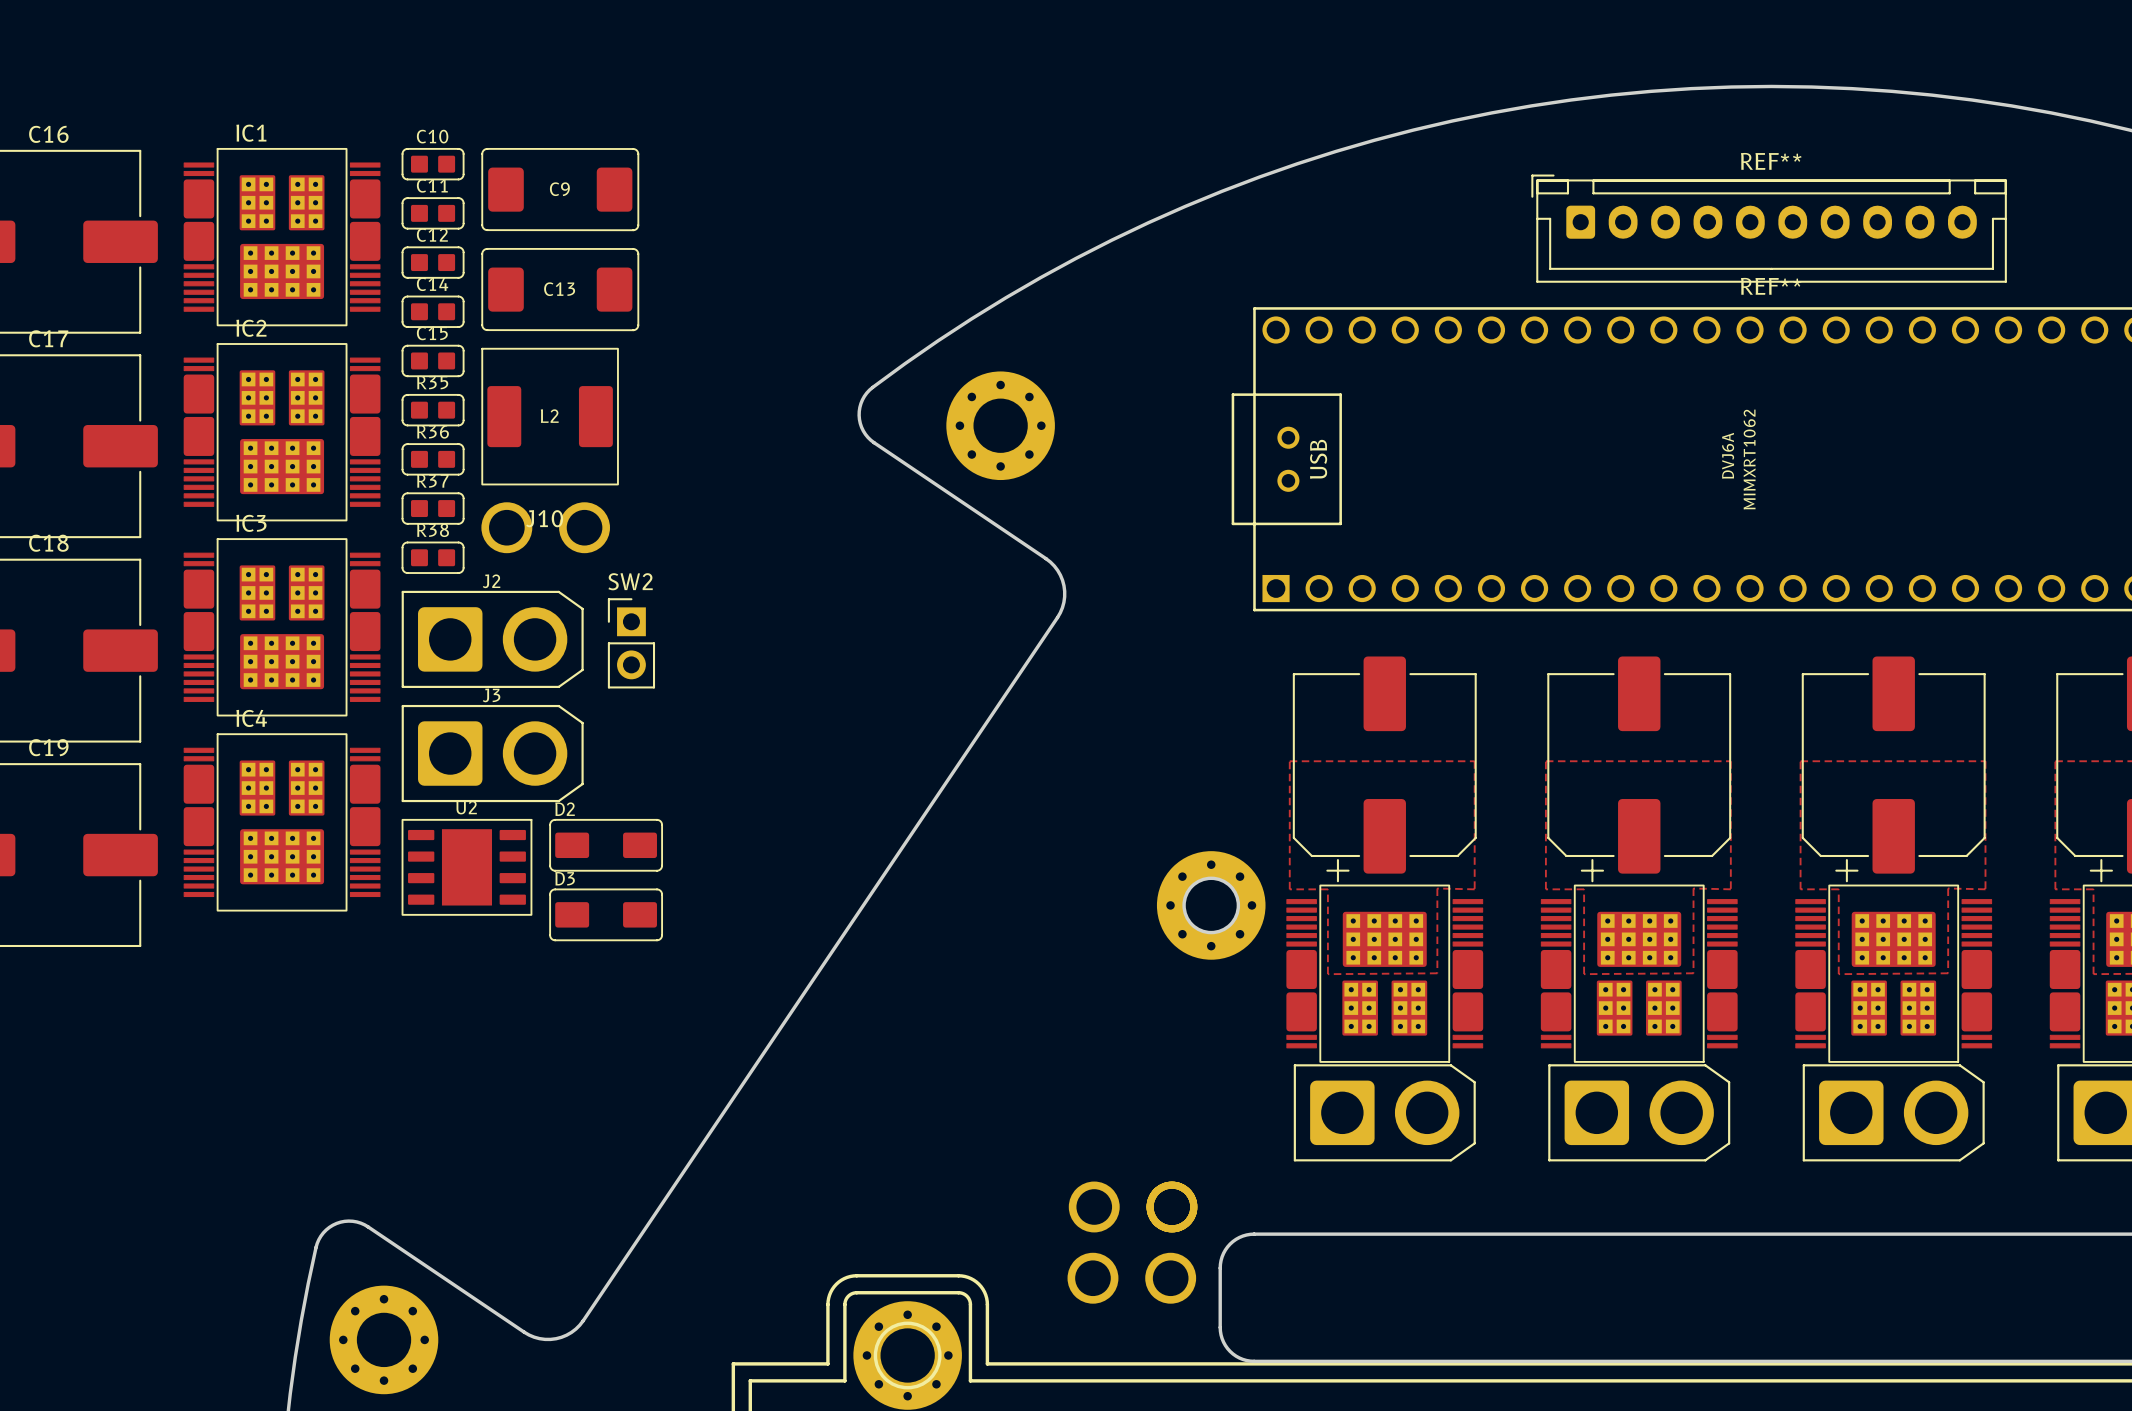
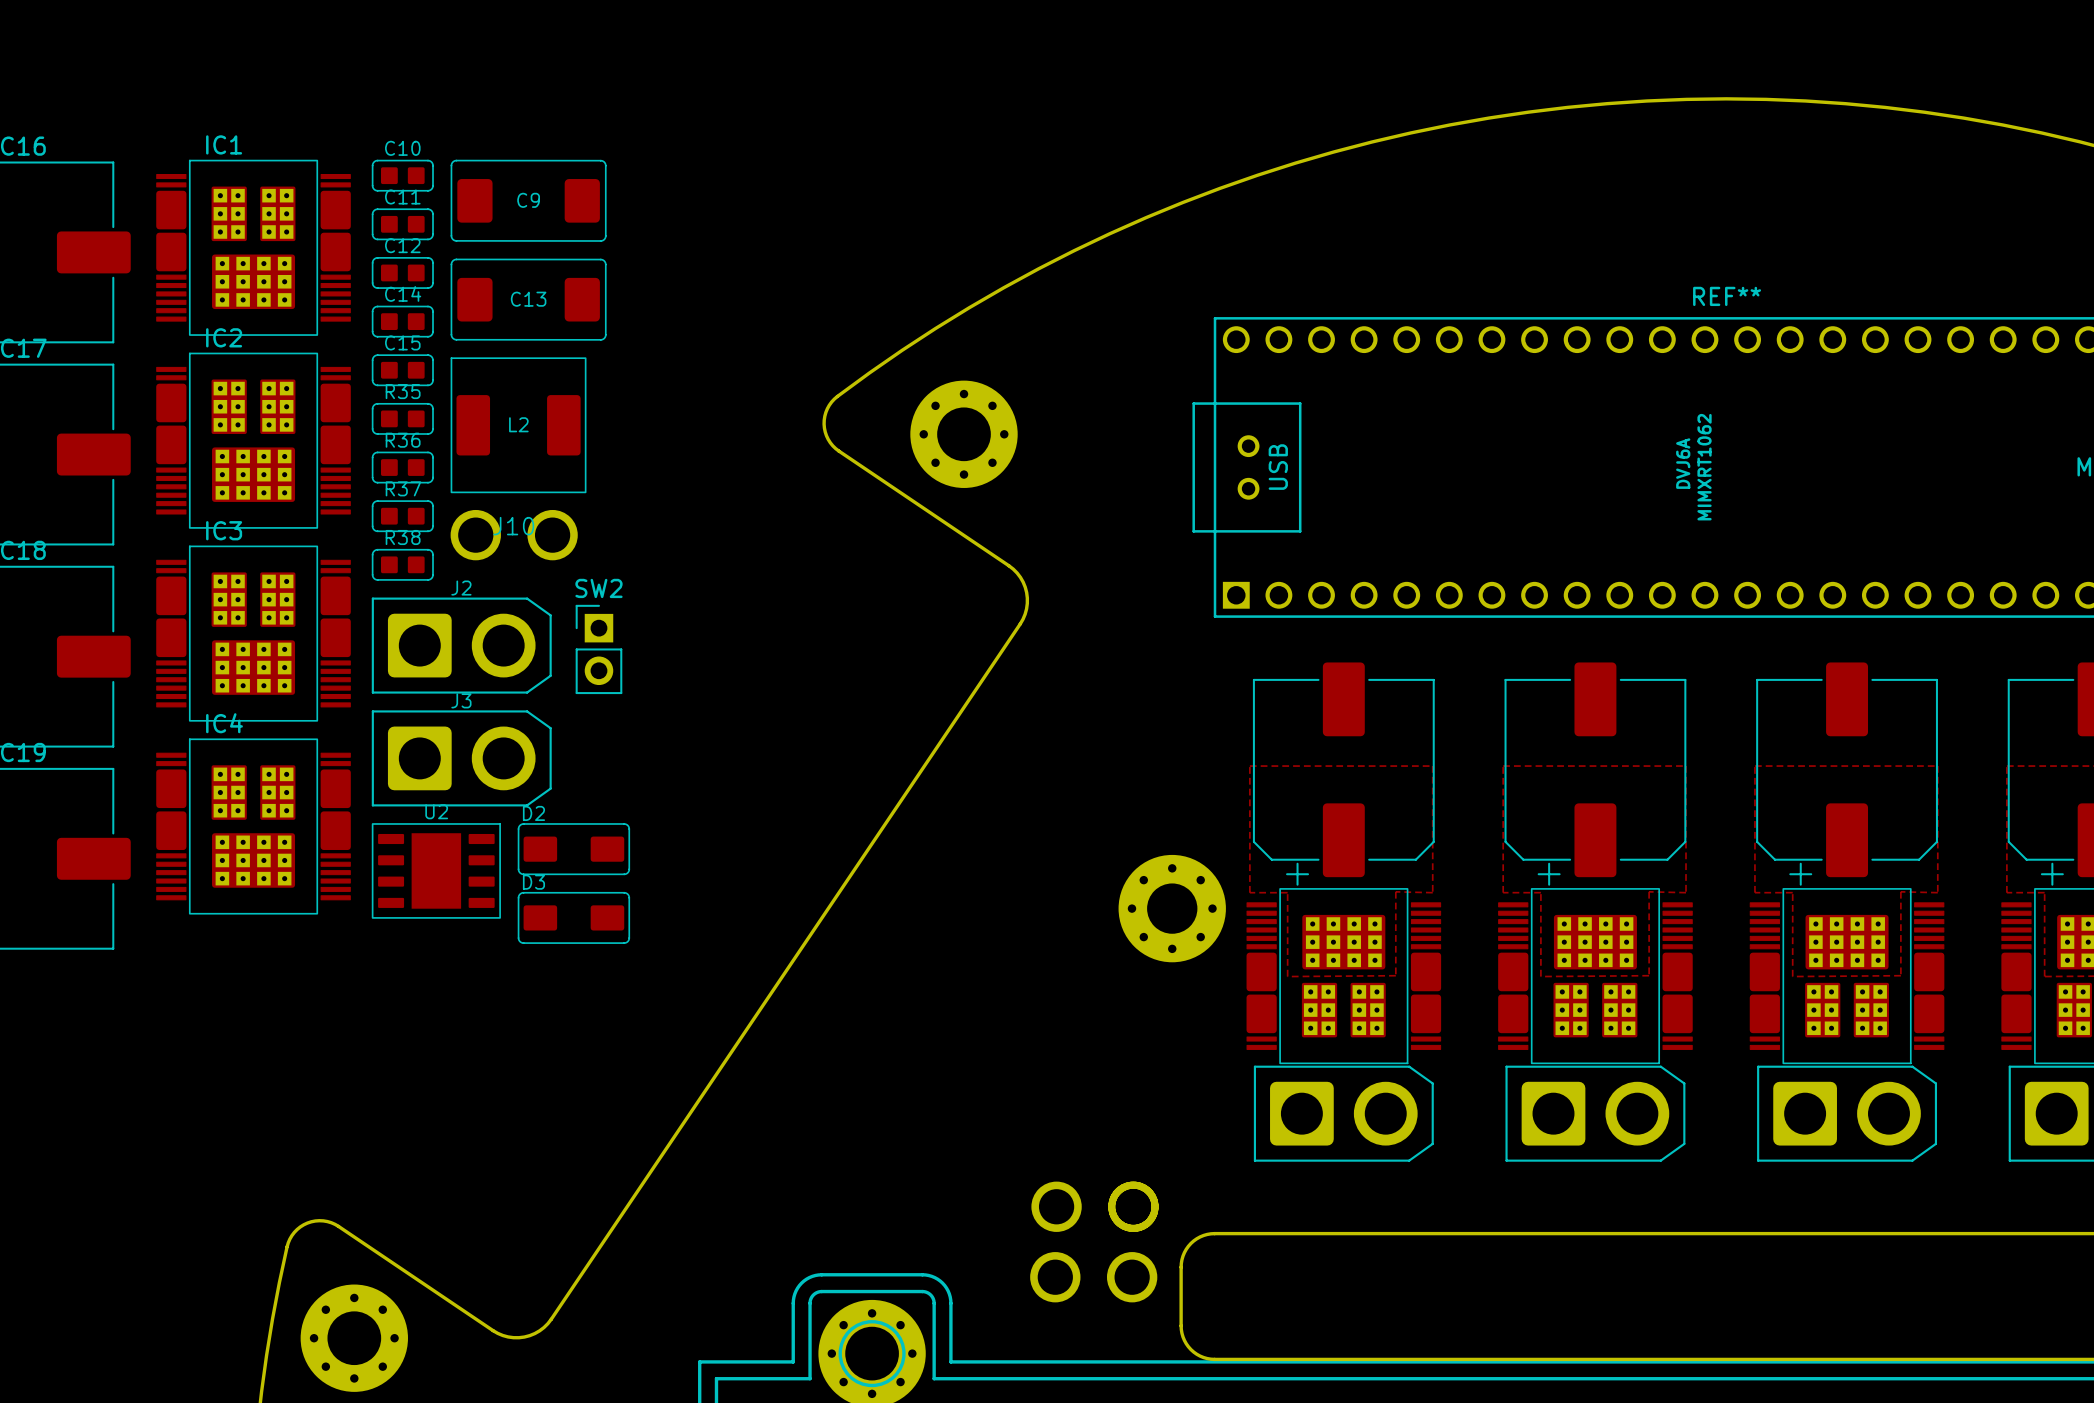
REF**: (1769, 228) -> none

